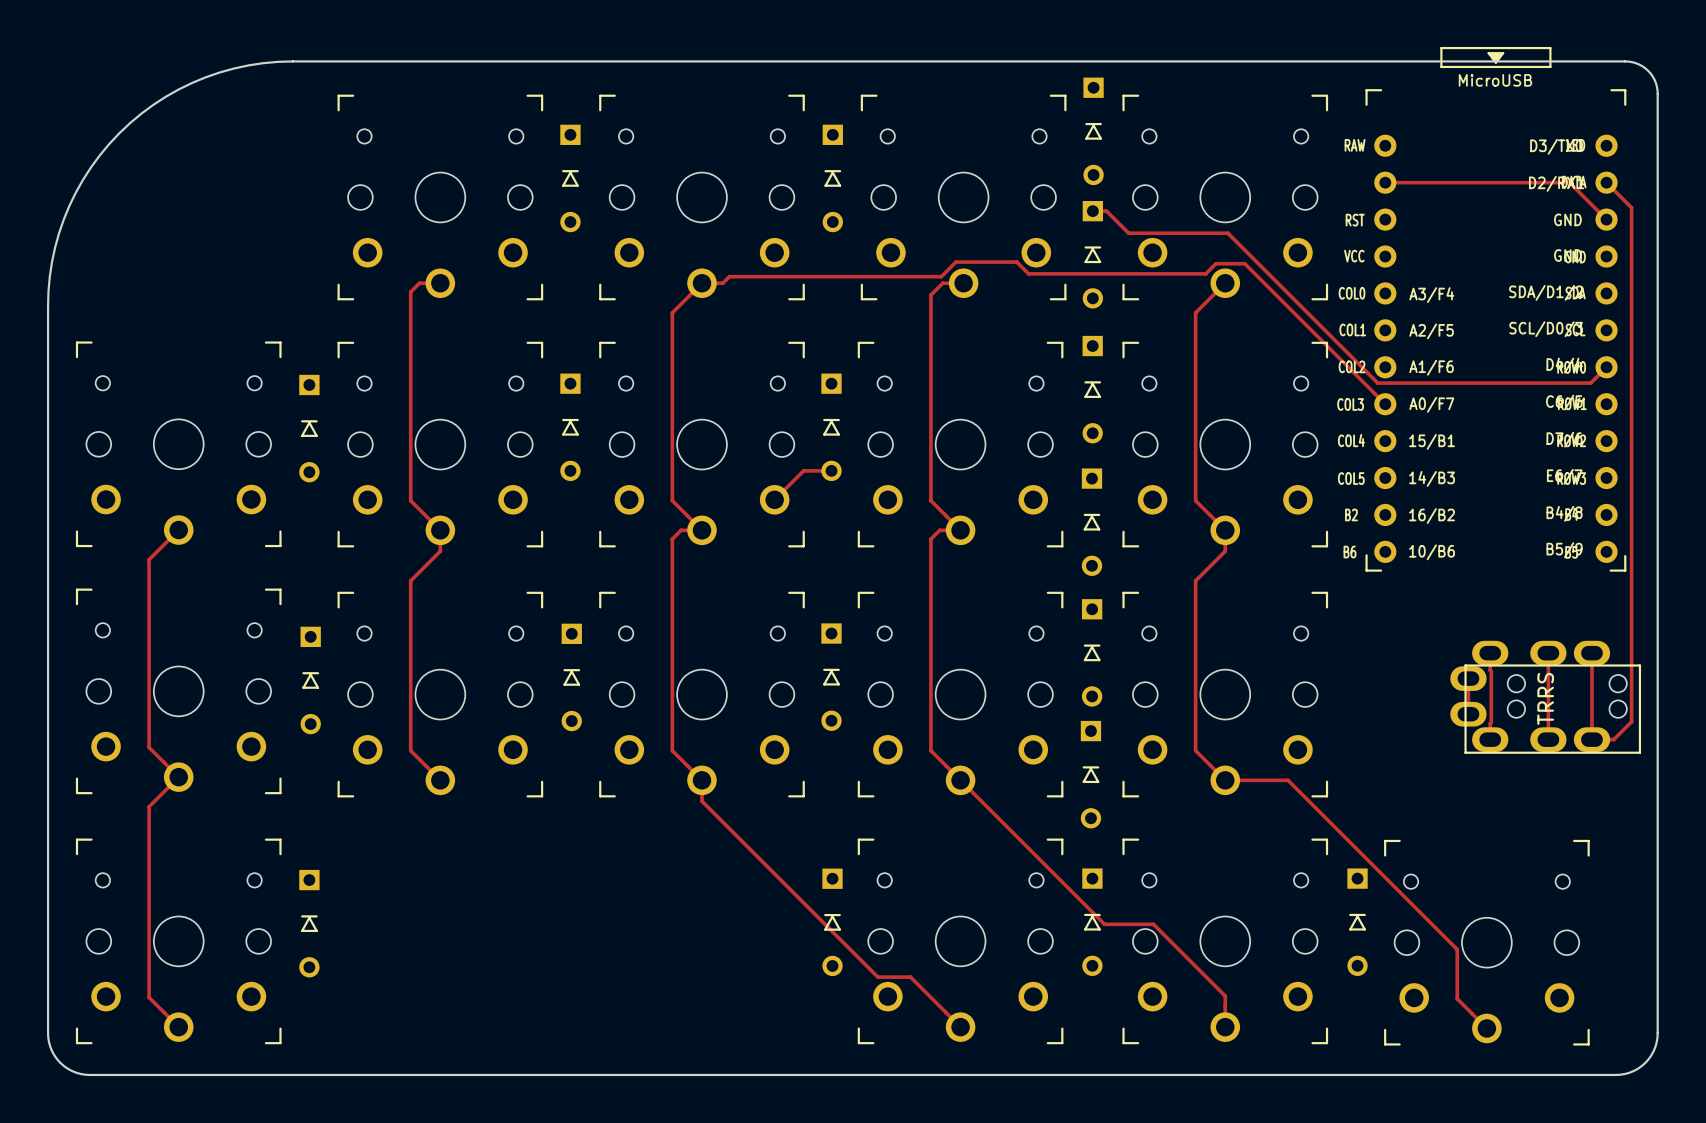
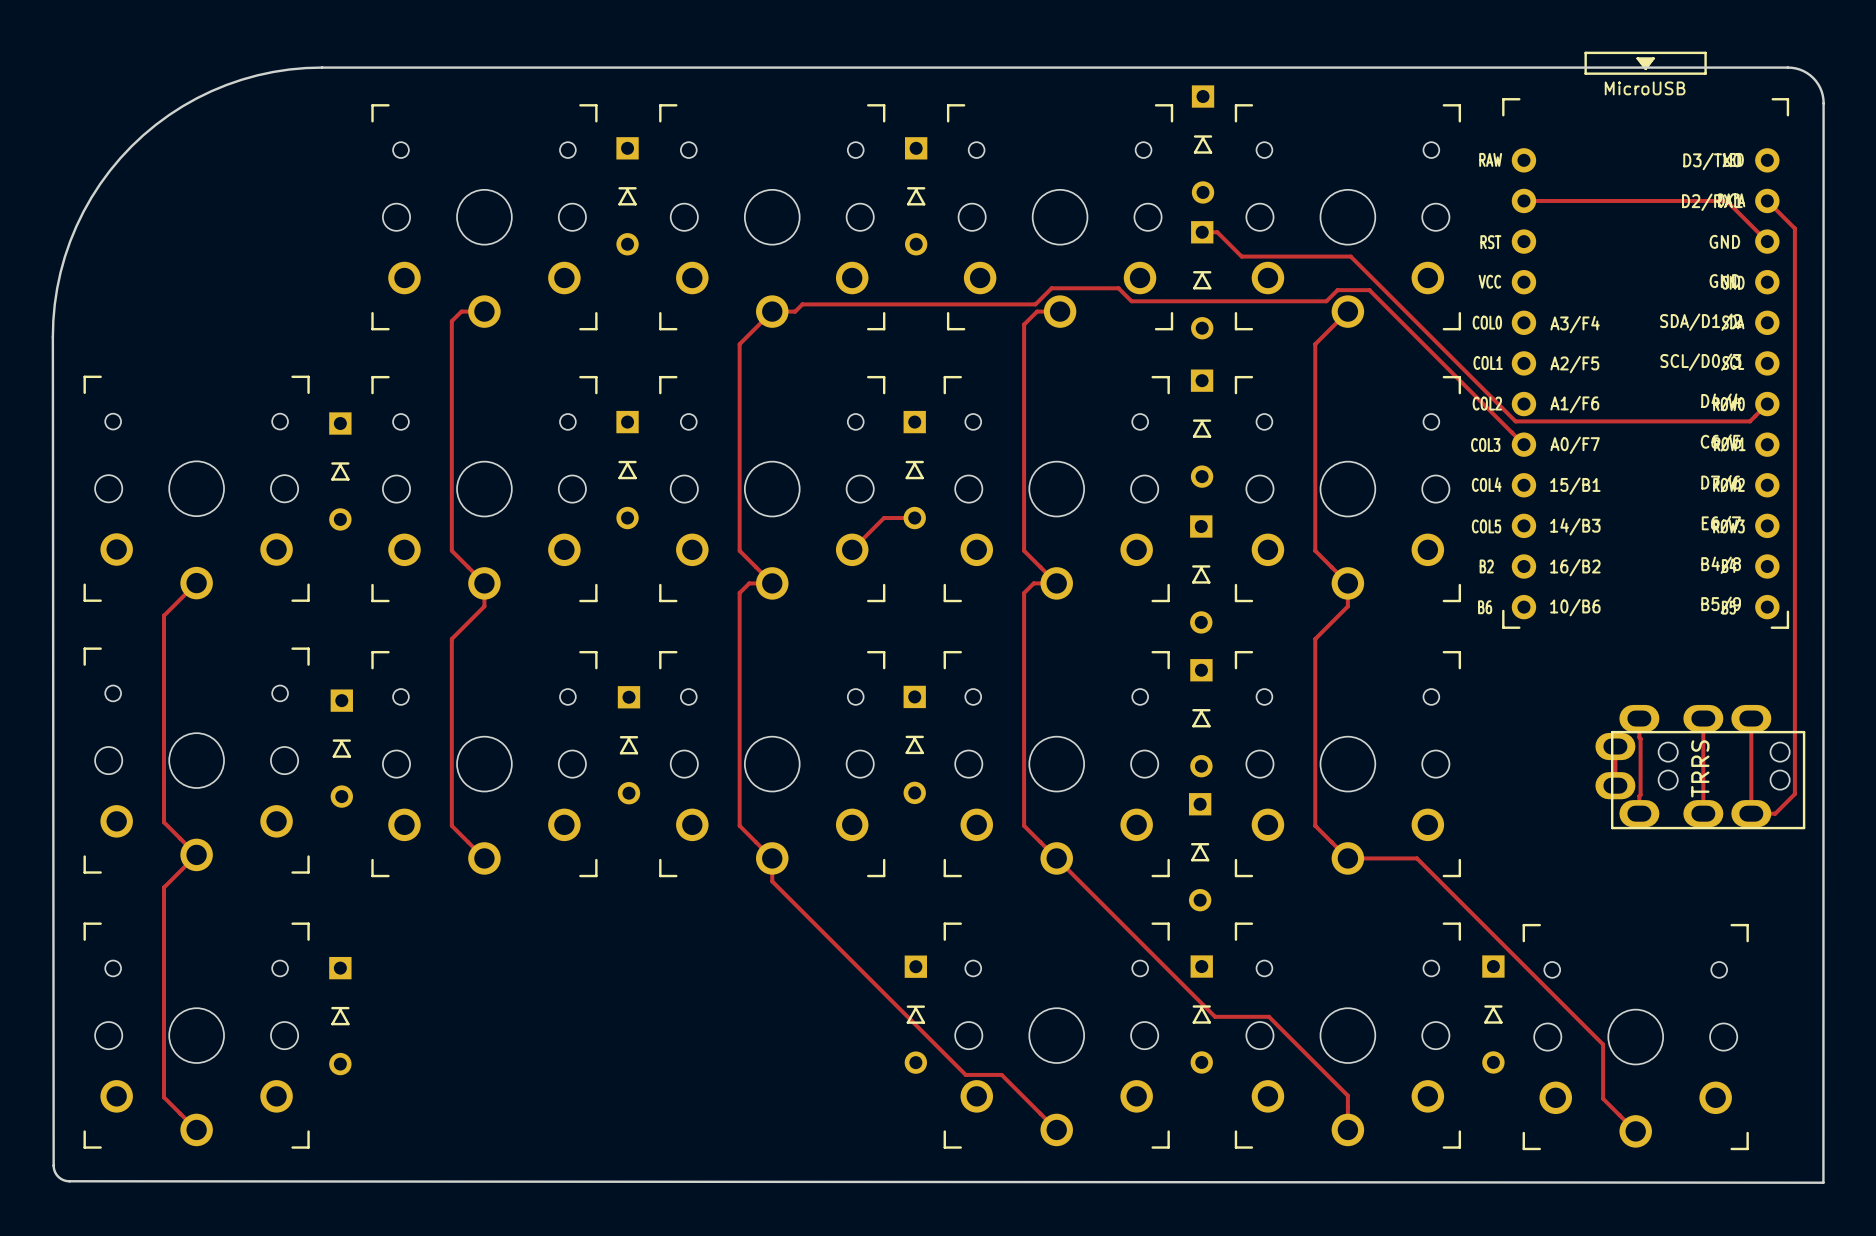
board edge: (1657, 93) (1657, 1032) (1655, 1046) (1648, 1059) (1634, 1070) (1620, 1074) (89, 1074) (71, 1070) (63, 1065) (54, 1055) (50, 1046) (48, 1033) (48, 306) -> (1823, 103) (1823, 1182) (62, 1179) (56, 1174) (53, 1165) (52, 337)

